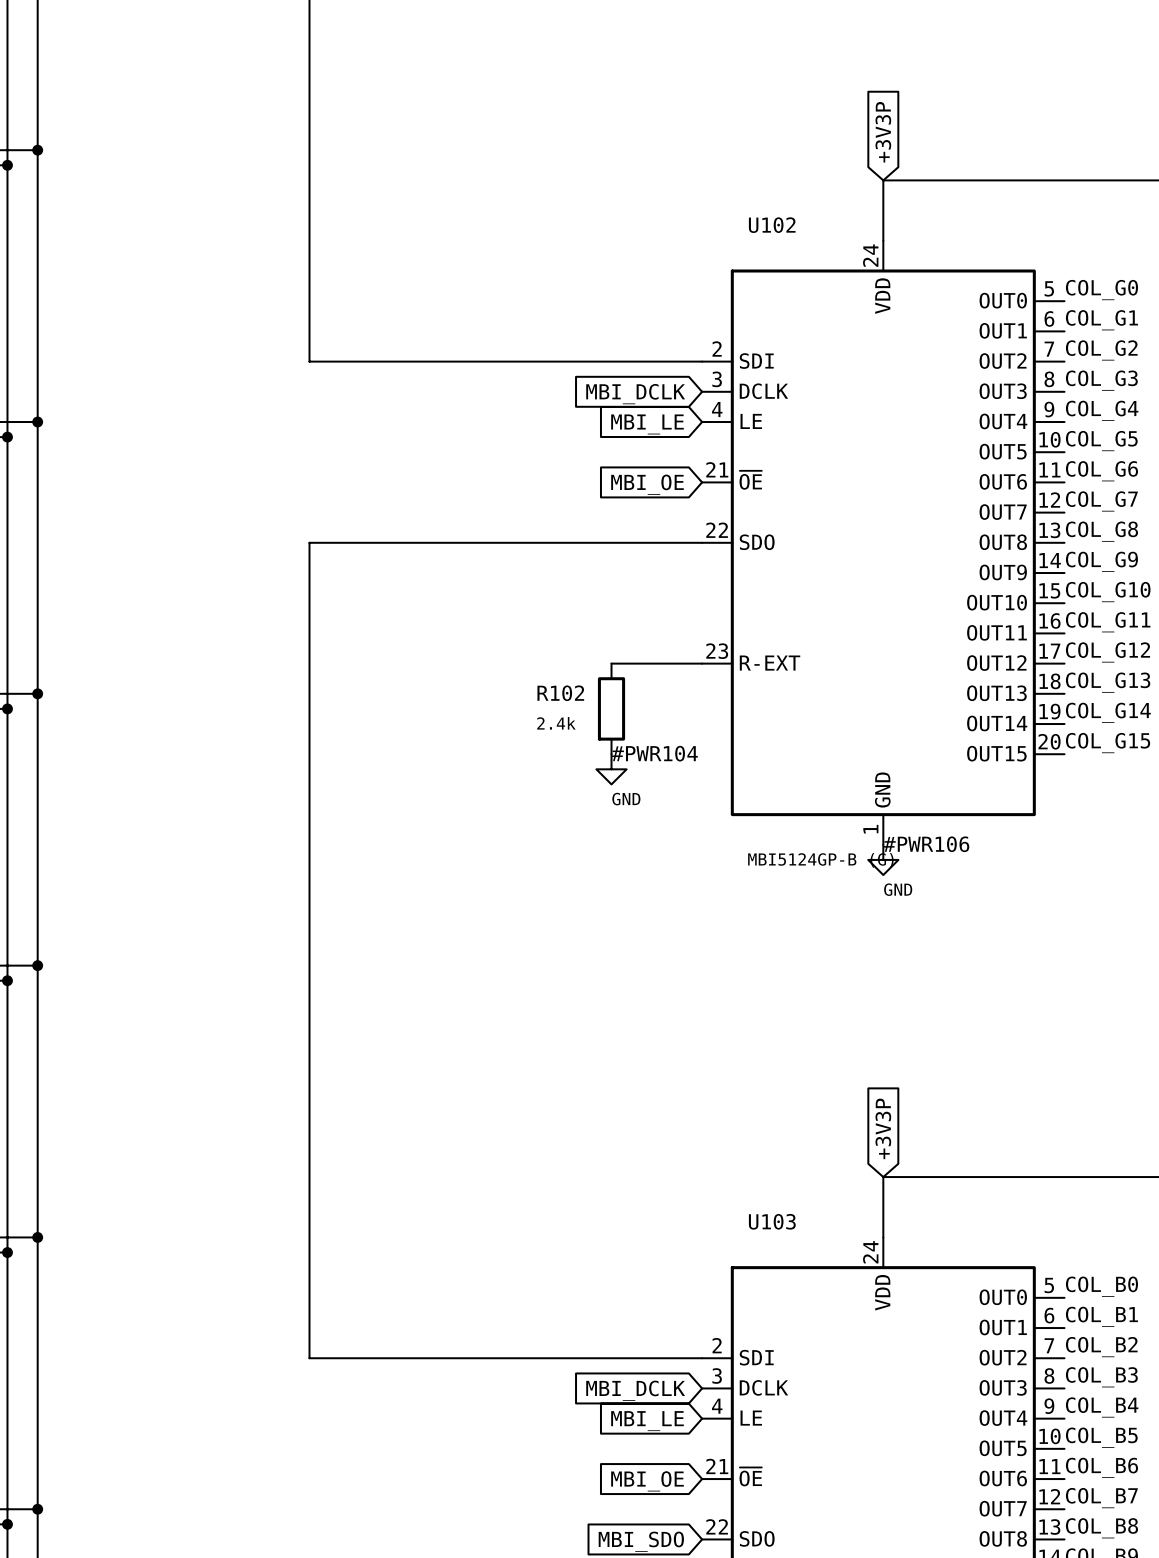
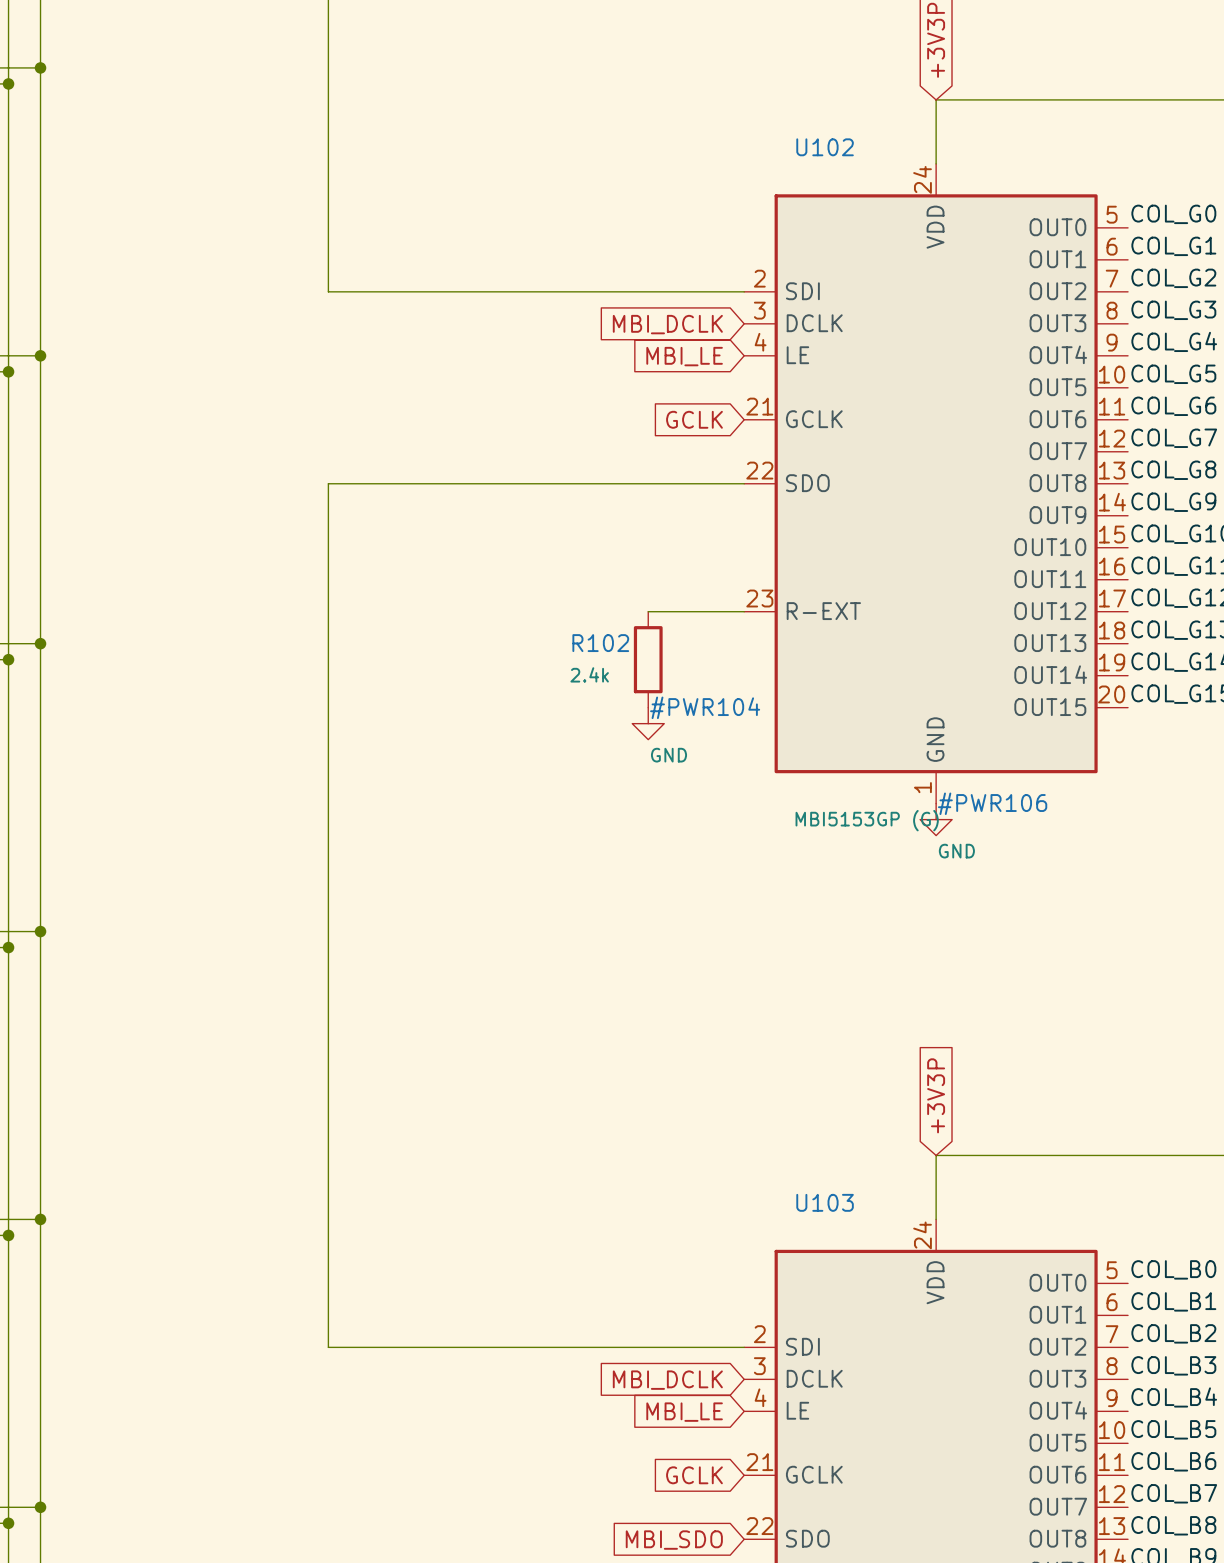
U102 pin name: ~{OE} (750, 480) -> GCLK (814, 419)
global label: MBI_OE (647, 484) -> GCLK (694, 419)
U102 value: MBI5124GP-B (G) (820, 860) -> MBI5153GP (G) (867, 820)
U103 pin name: ~{OE} (750, 1476) -> GCLK (814, 1474)
global label: MBI_OE (647, 1481) -> GCLK (694, 1475)

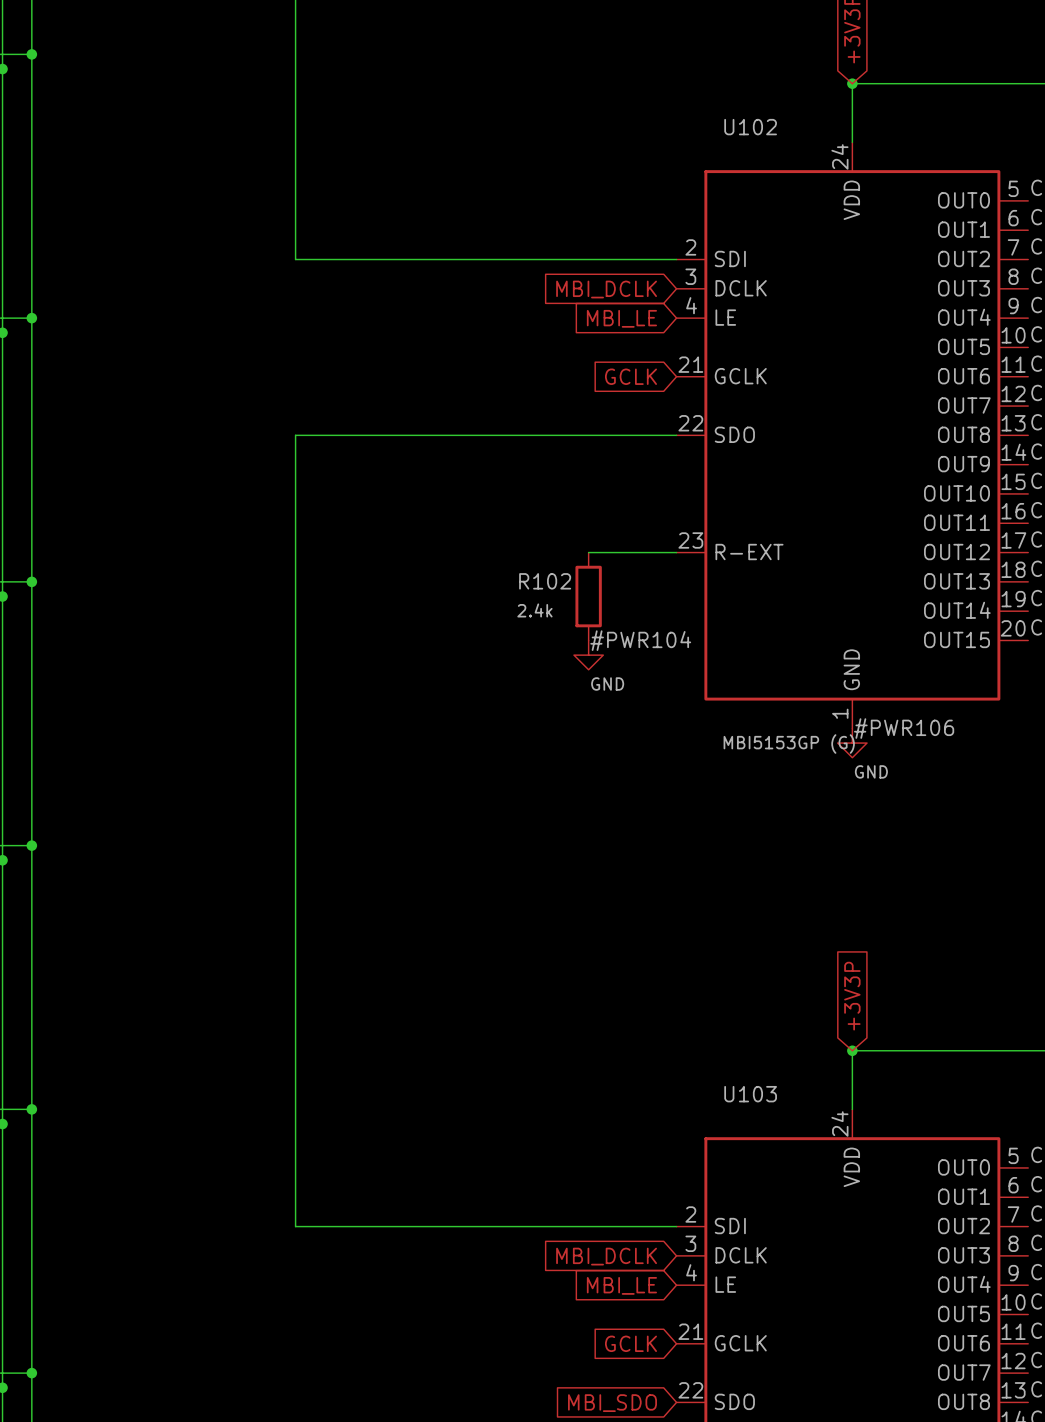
junction: none -> (852, 83)
junction: none -> (852, 1050)

